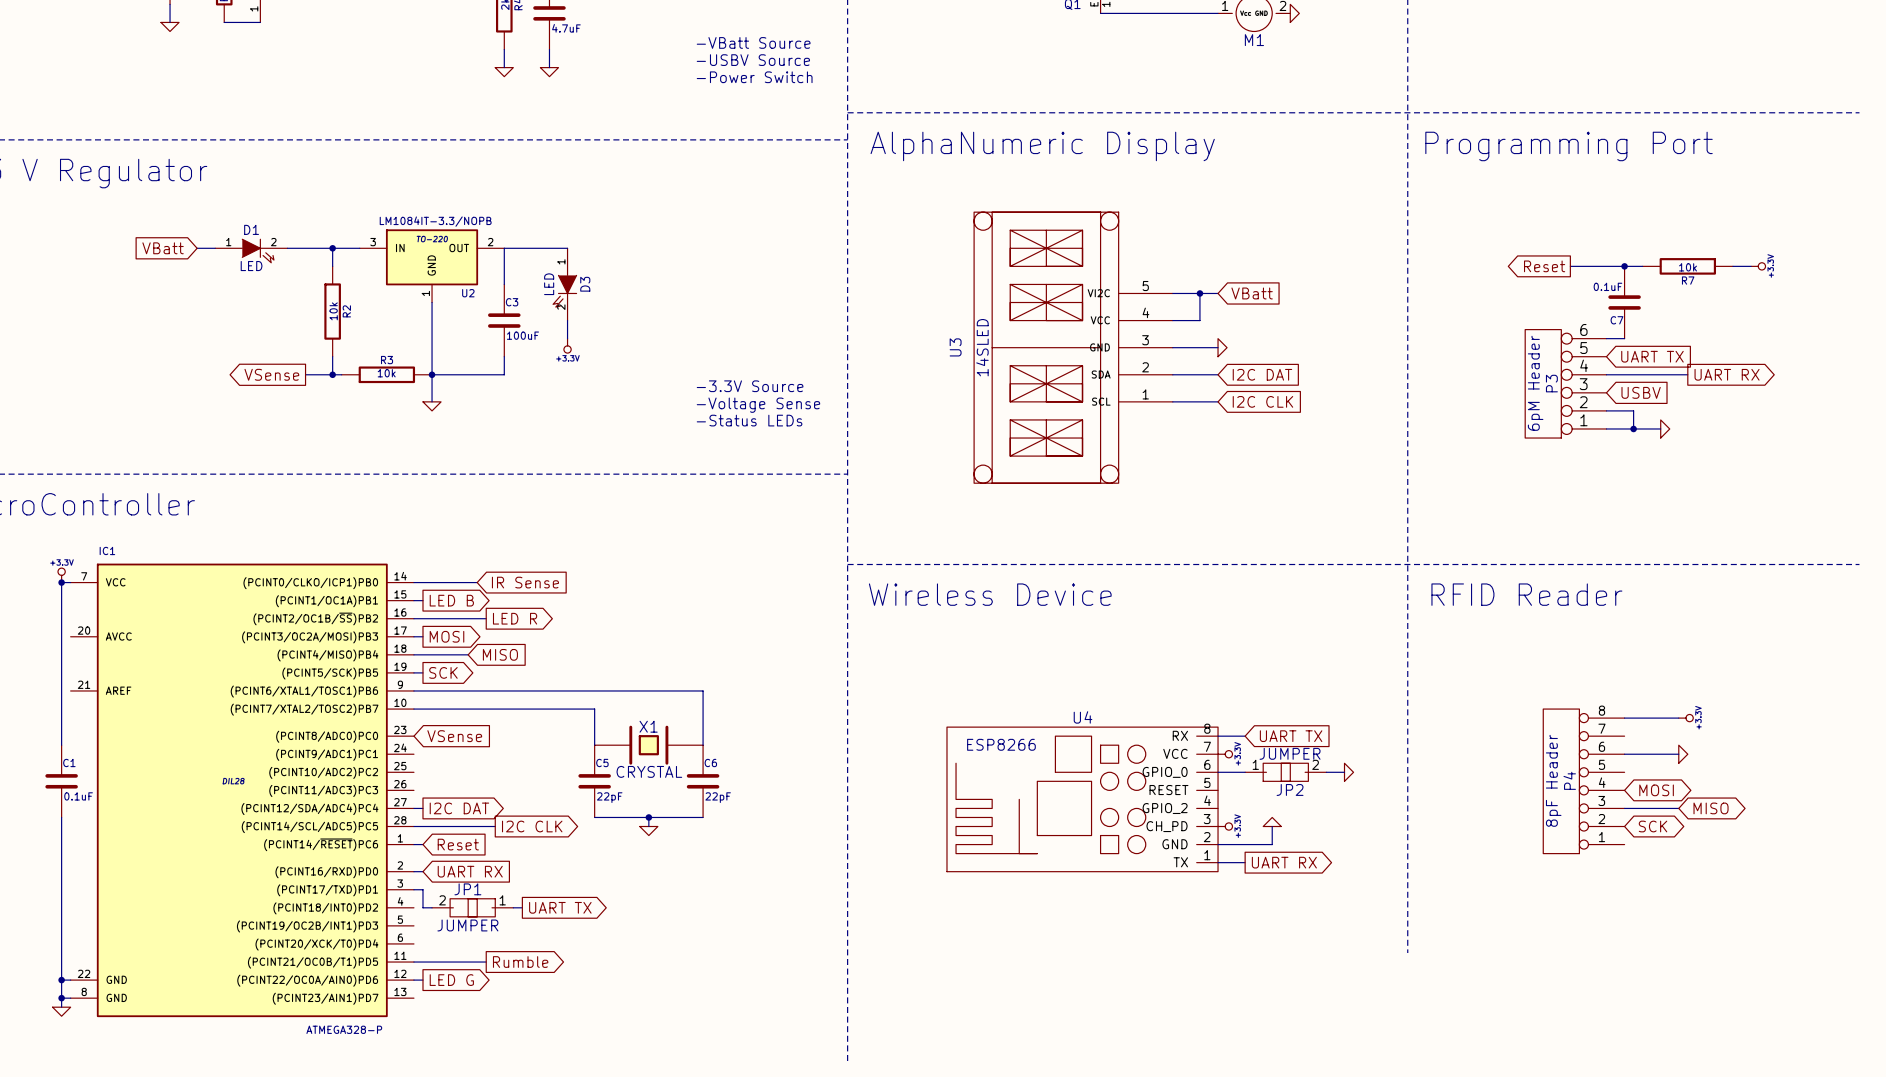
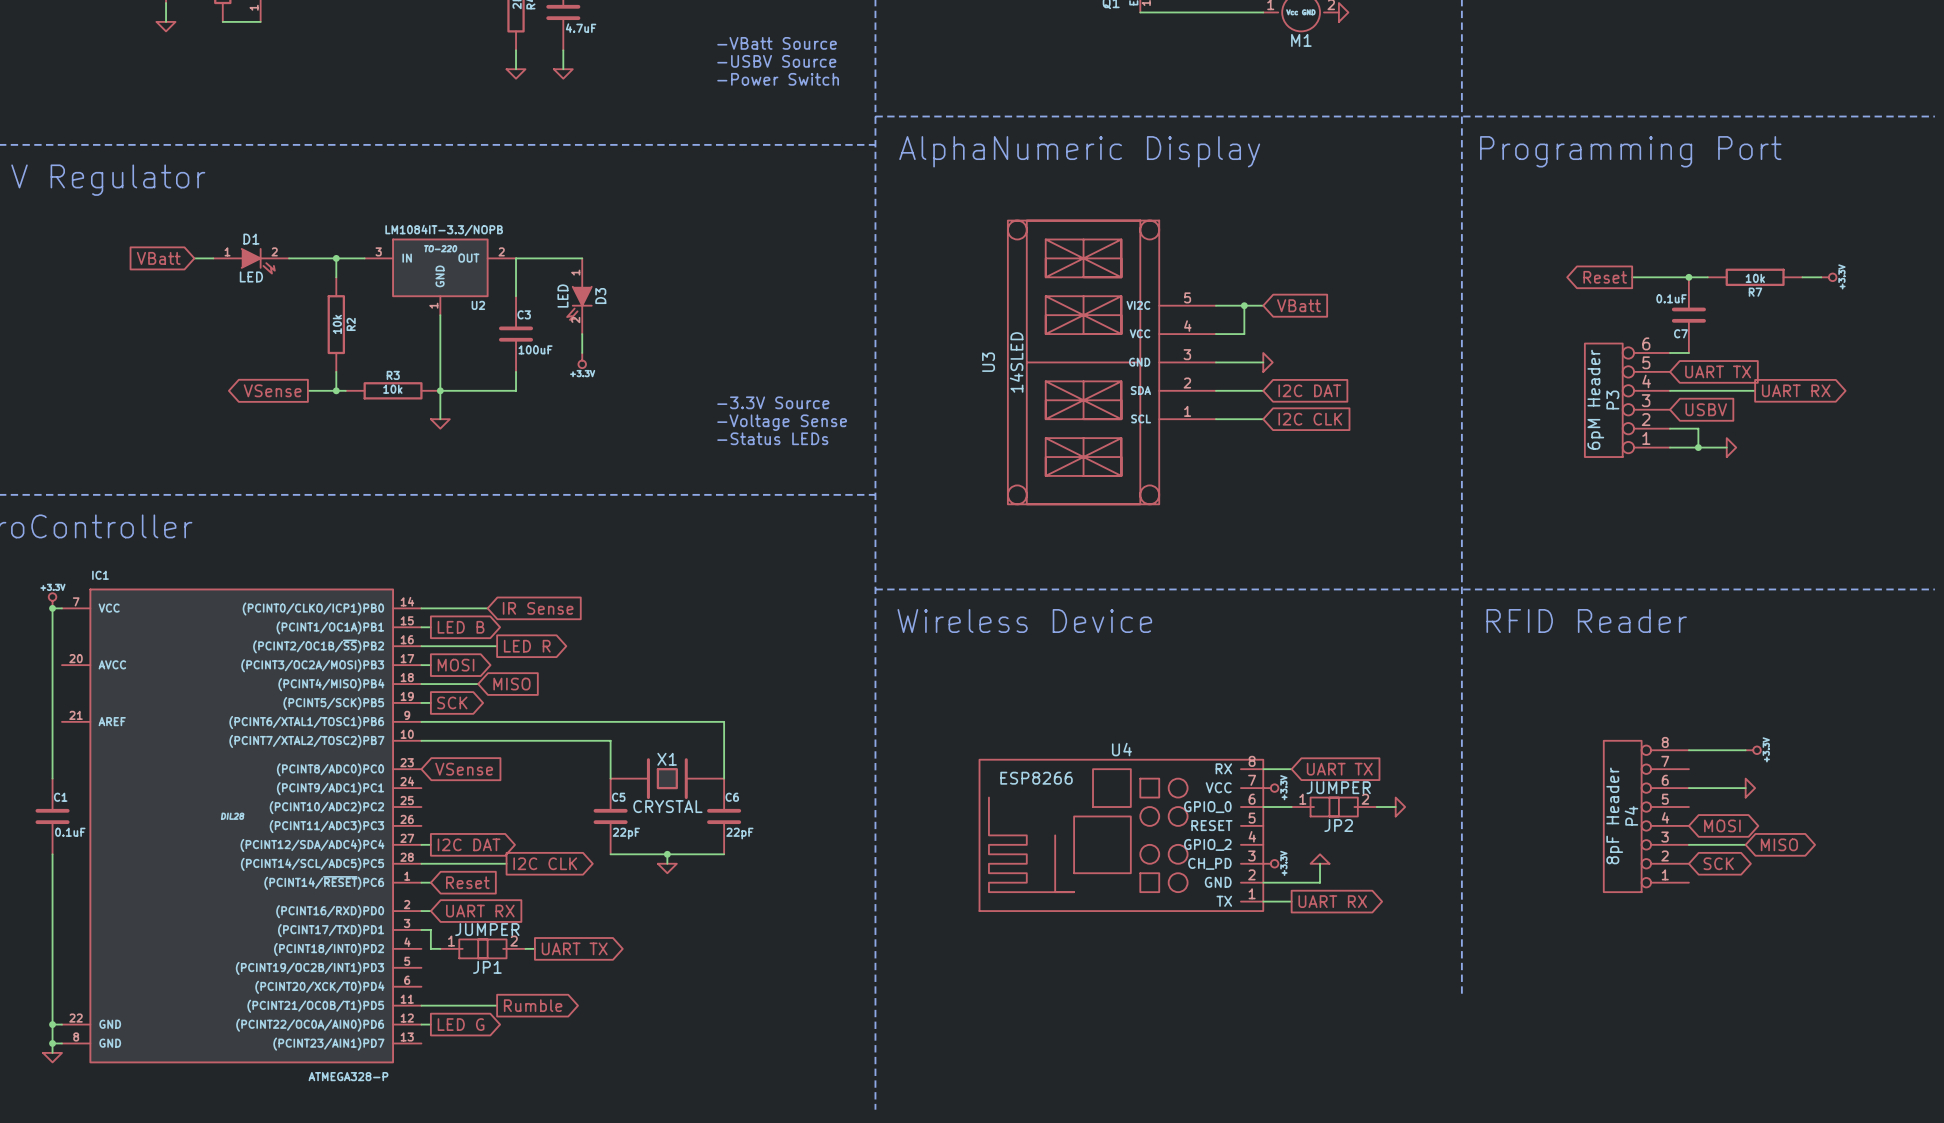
JP1 rotation: 0° (472, 907) -> 180° (482, 948)

